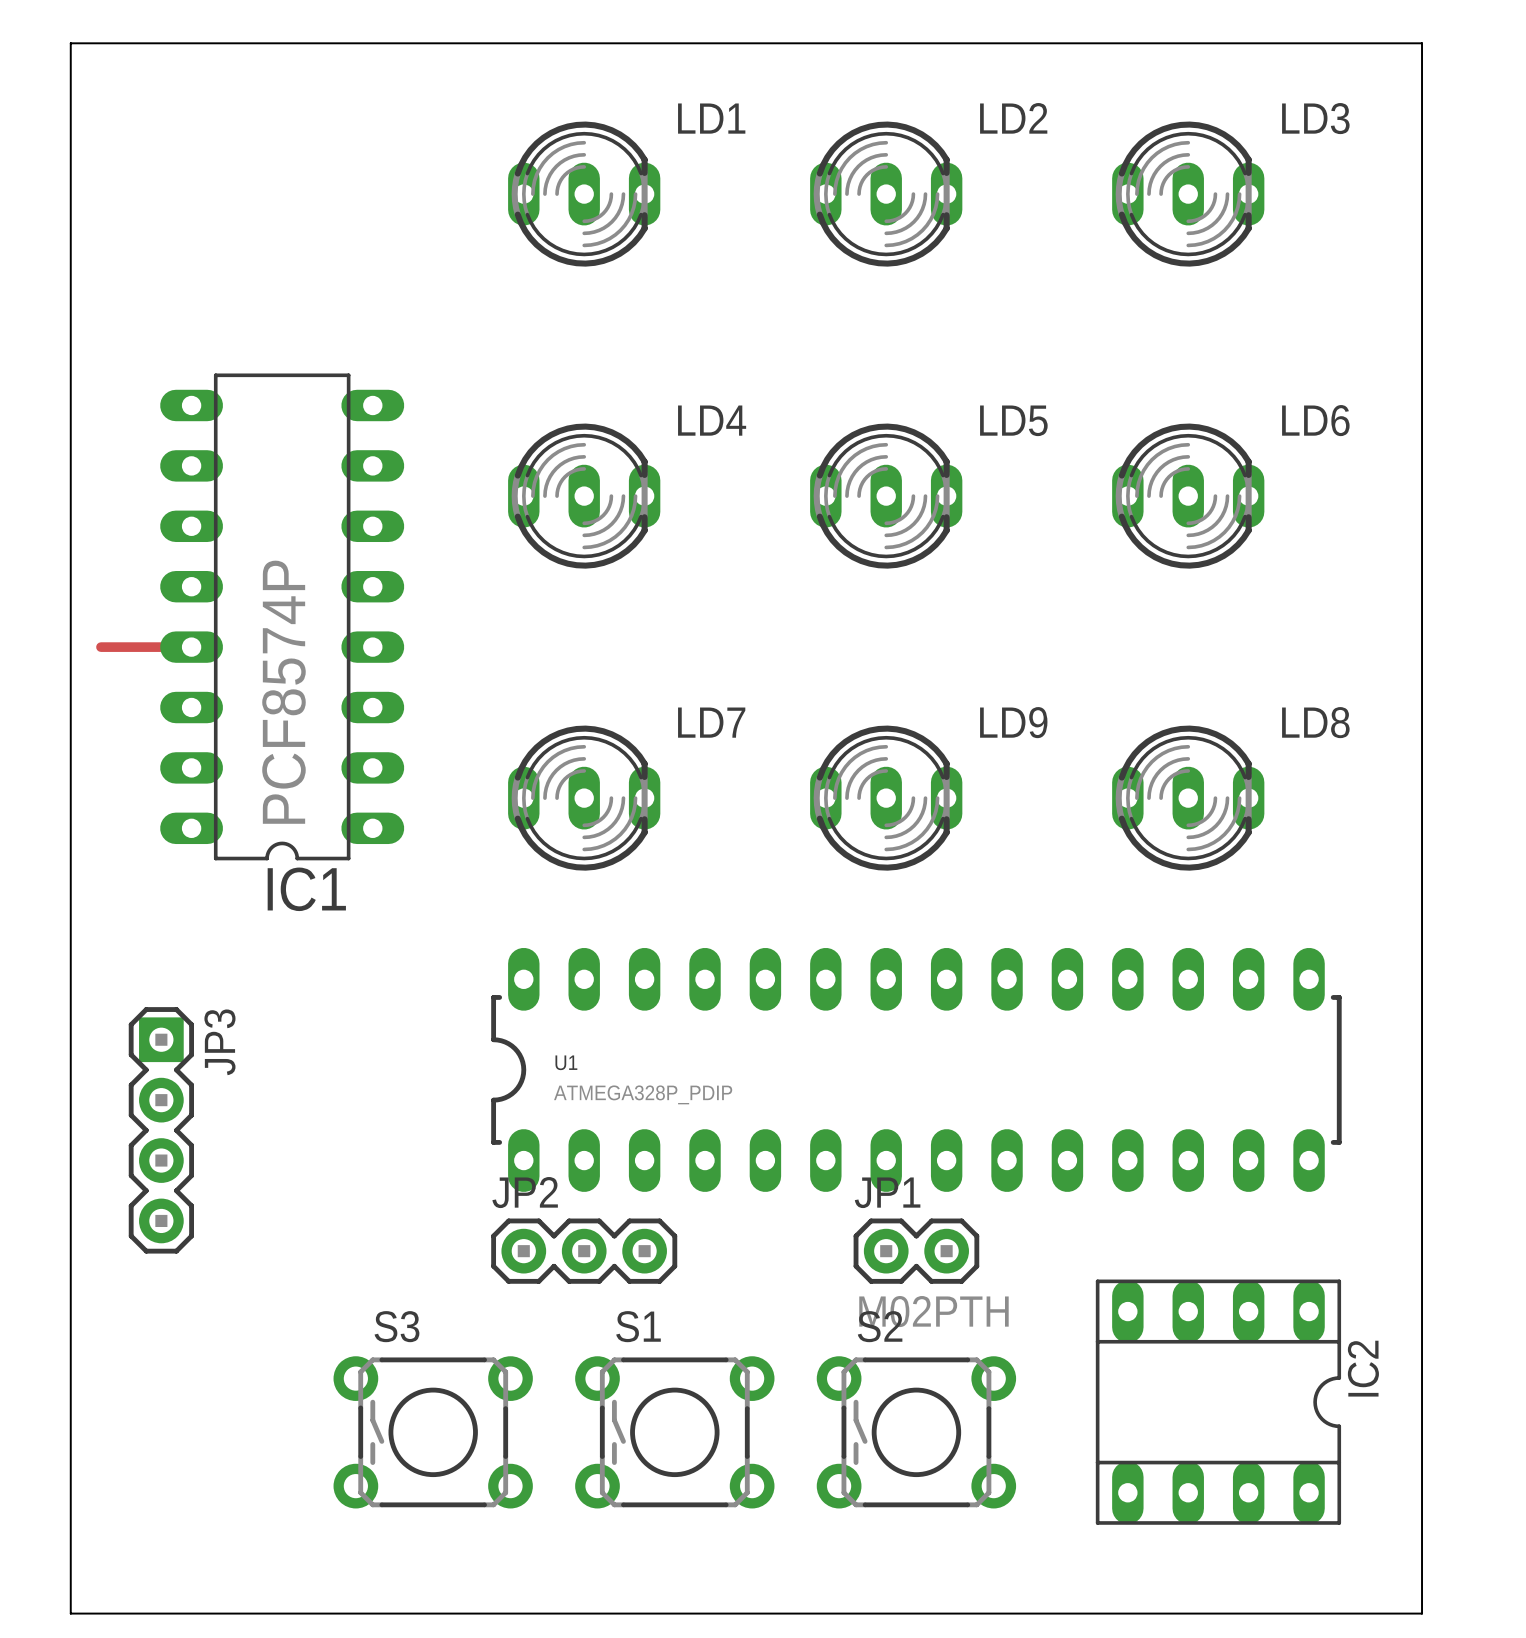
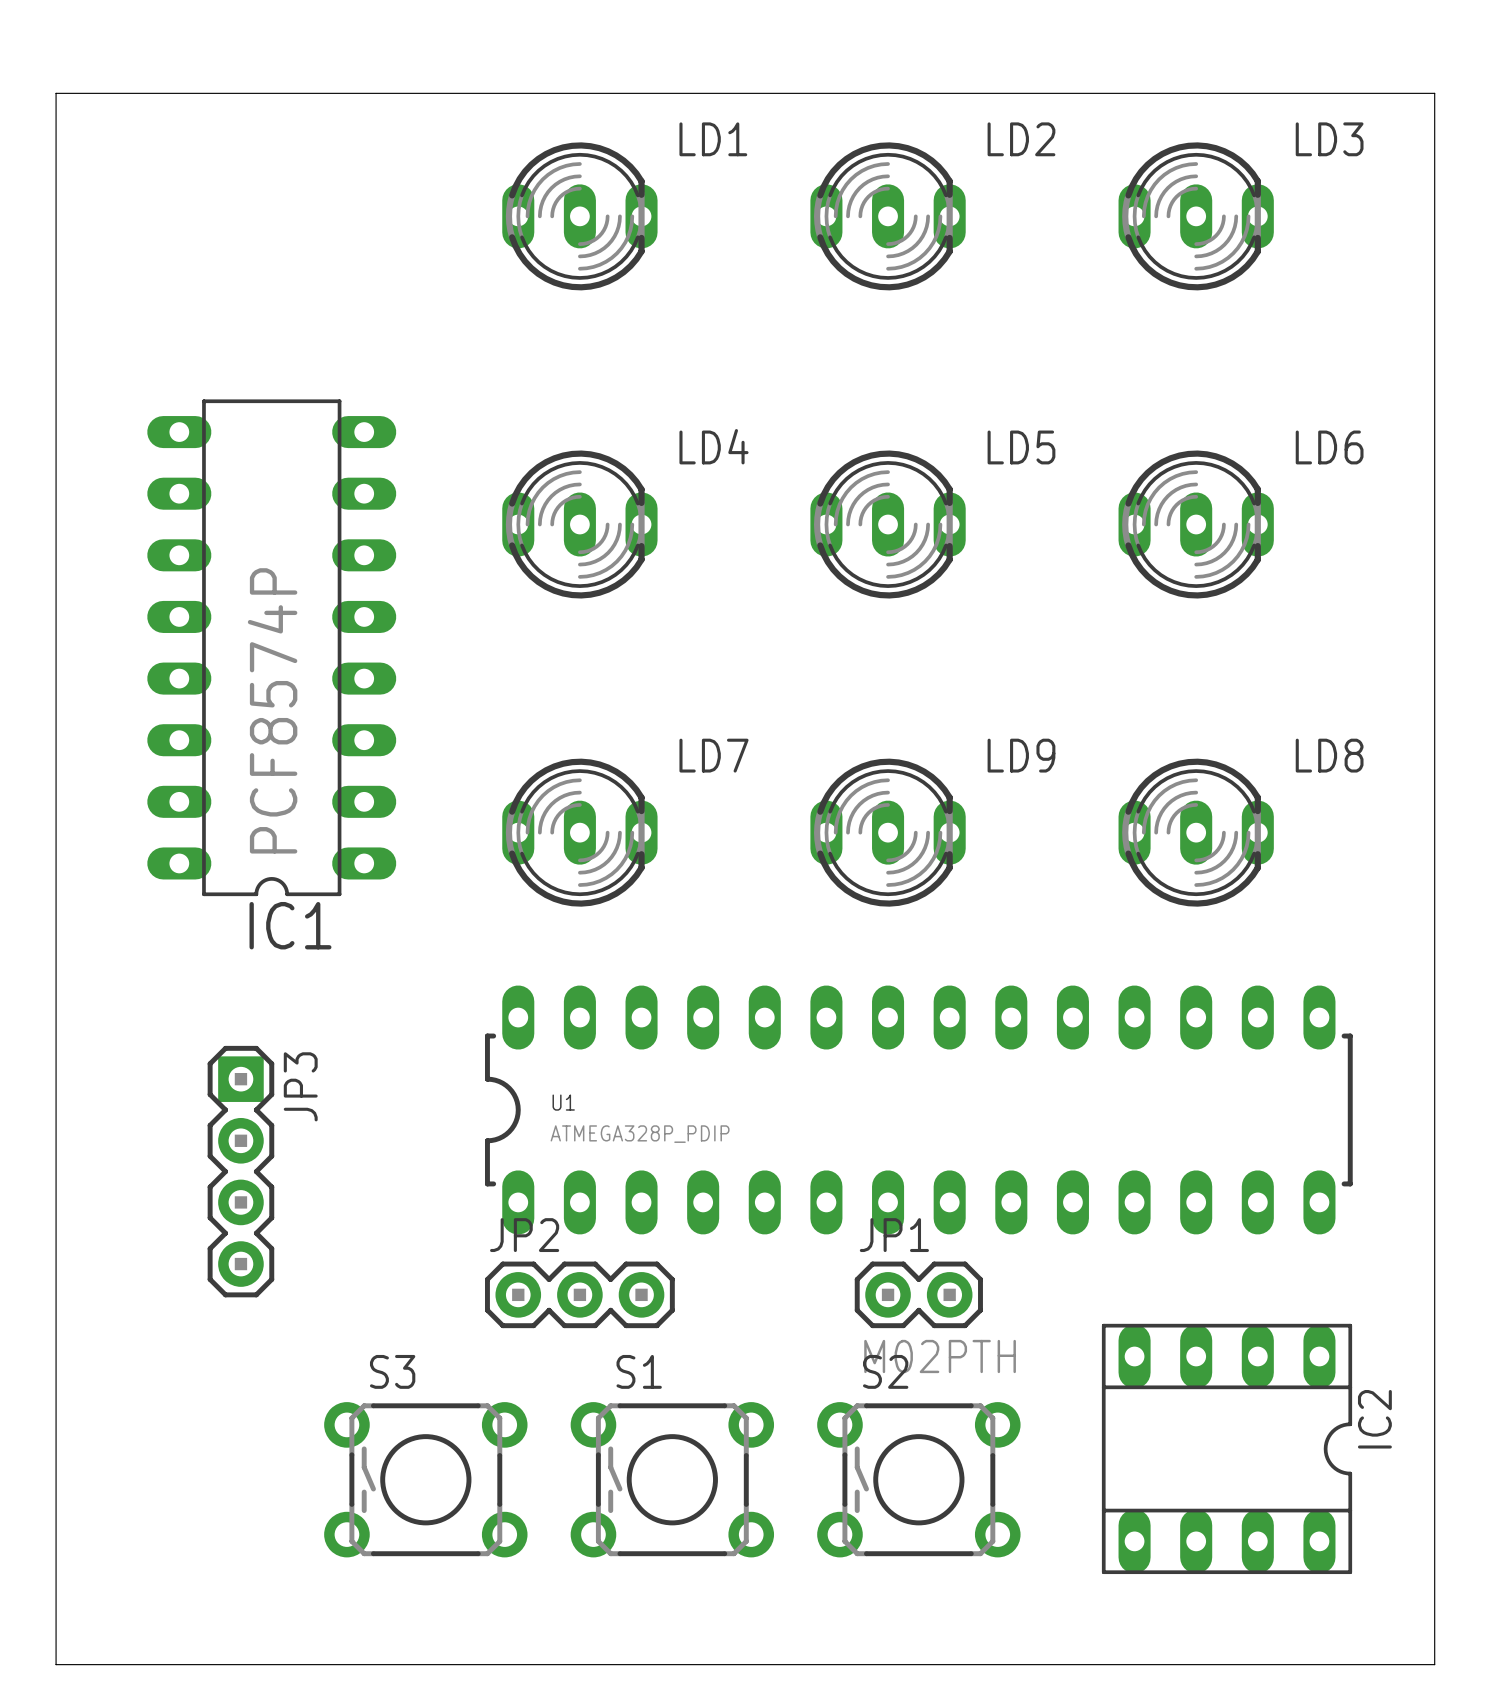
board edge: (70, 73) (70, 43) (1422, 43) (1422, 73) -> (56, 93) (1434, 93)
track: (100, 647) (191, 647) -> none
JP3 position: (161, 1130) -> (240, 1171)

